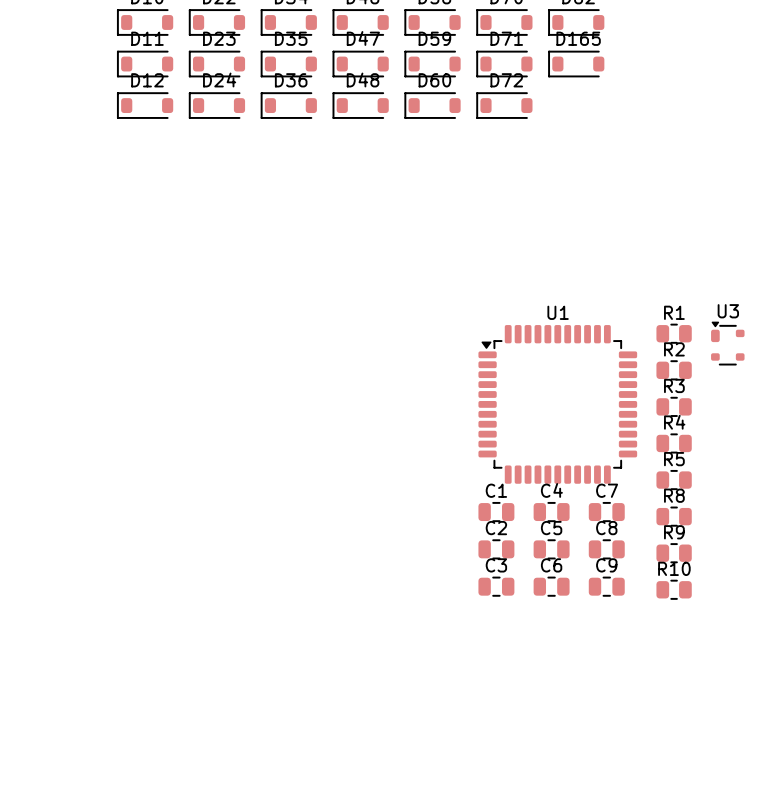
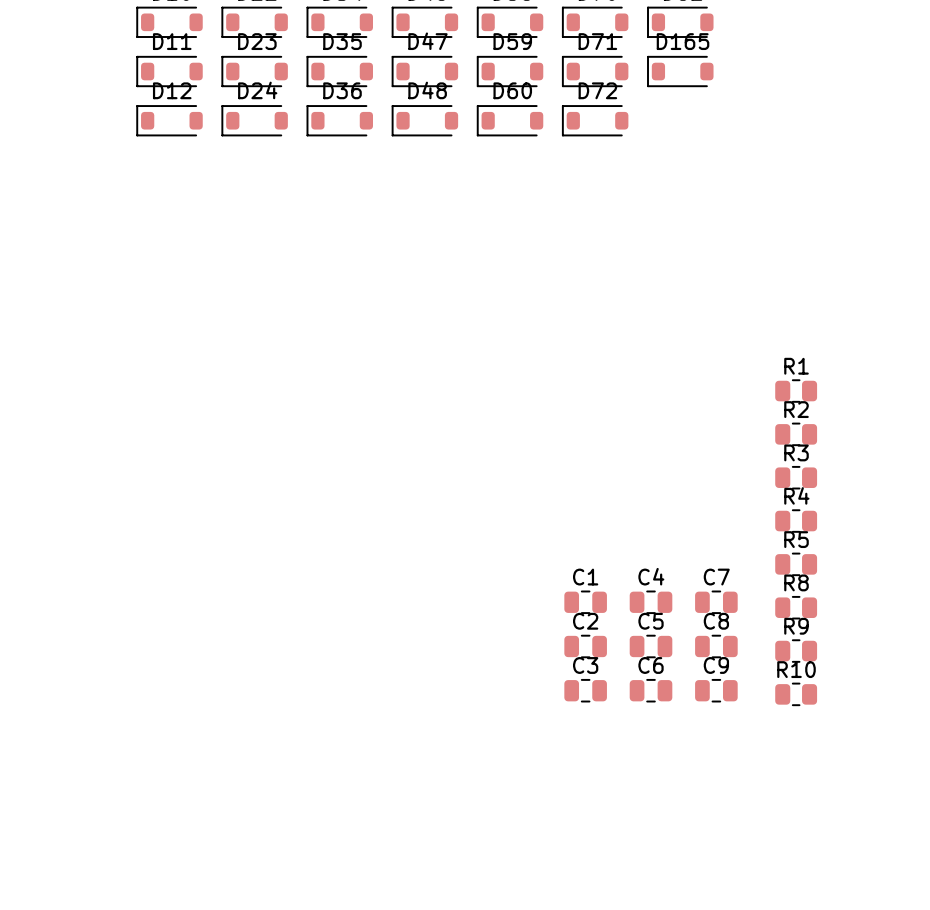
U3: (727, 343) -> none
U1: (557, 404) -> none

